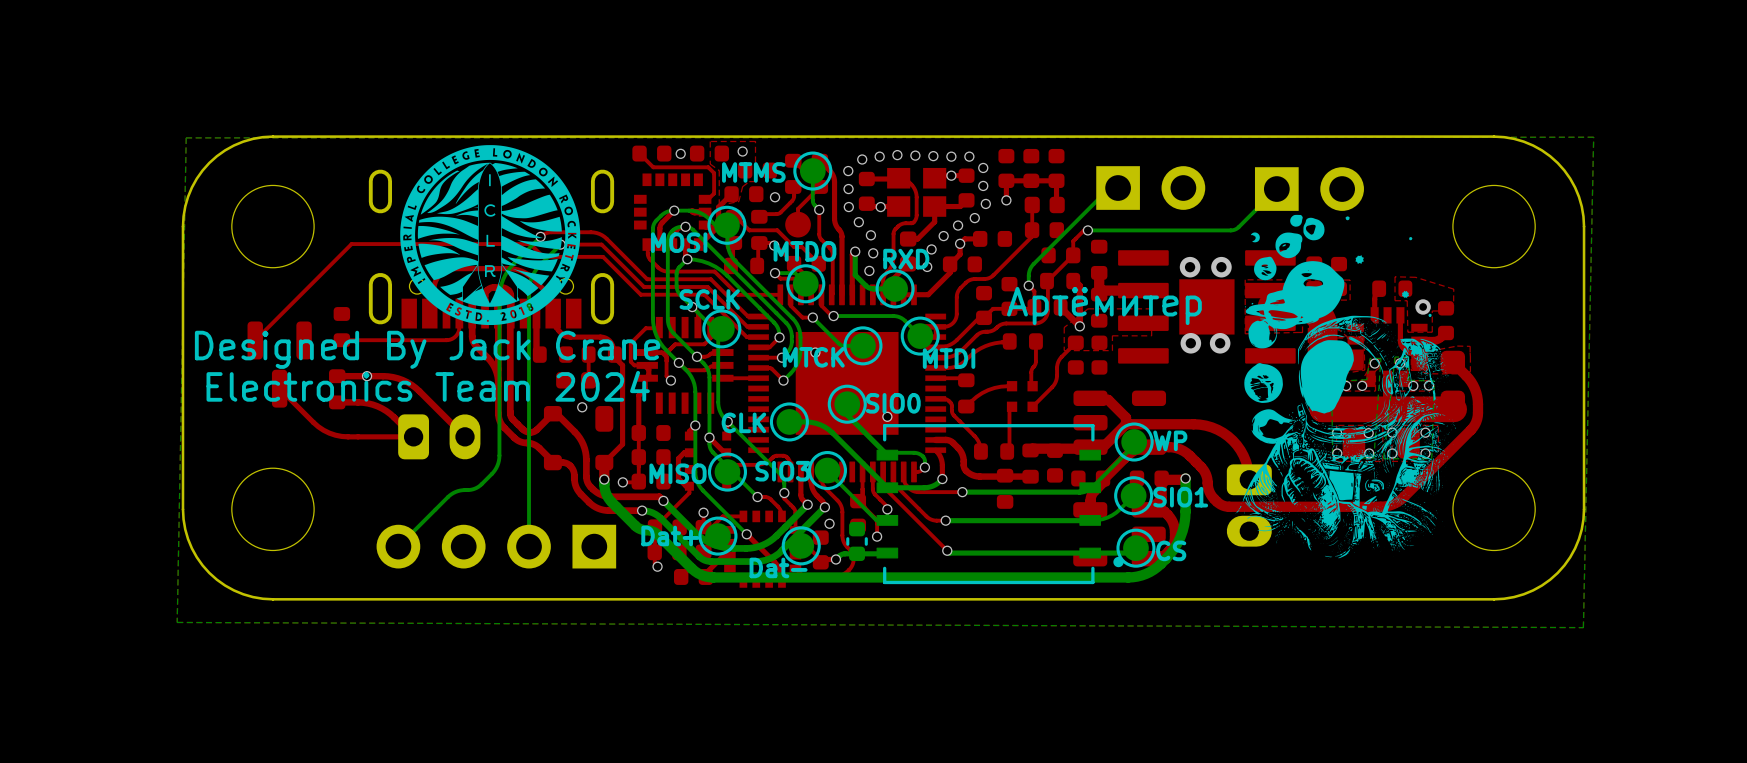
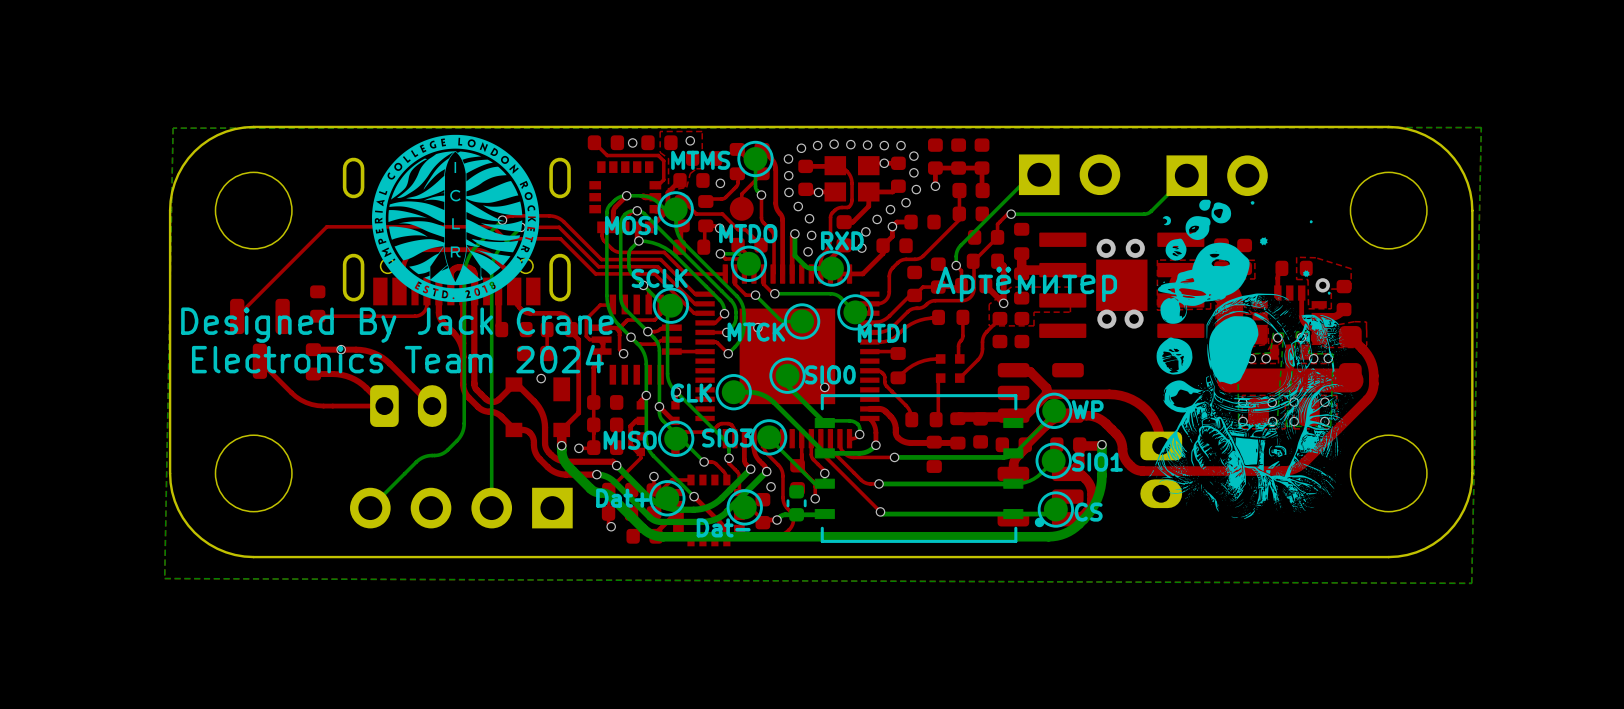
part footprint: [543, 406, 614, 471] -> [505, 377, 571, 438]

